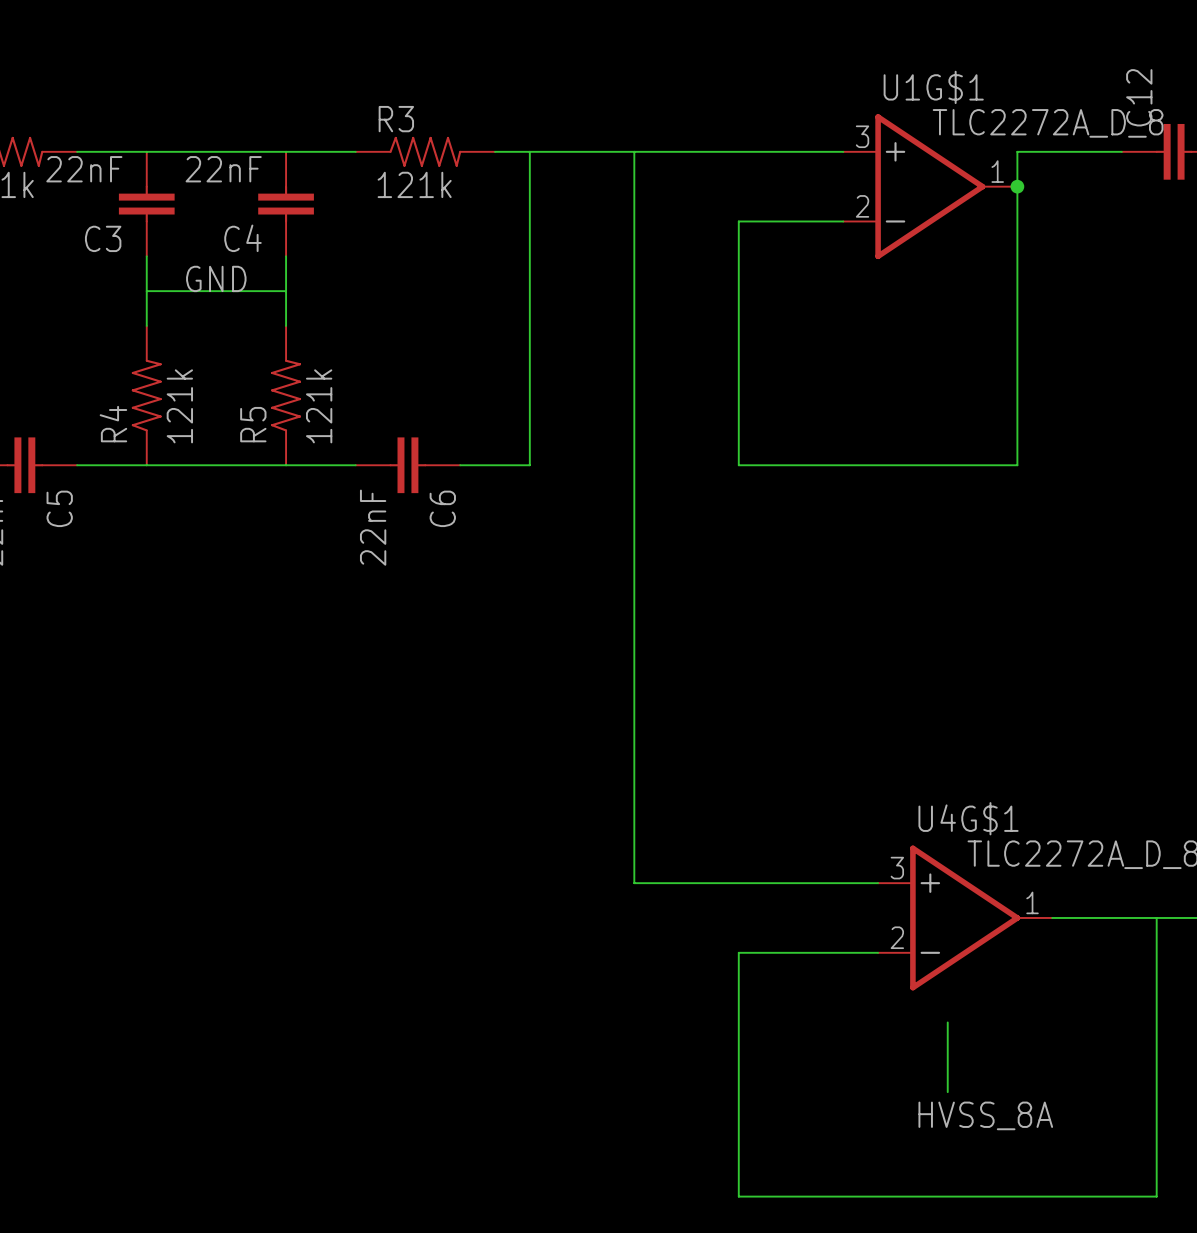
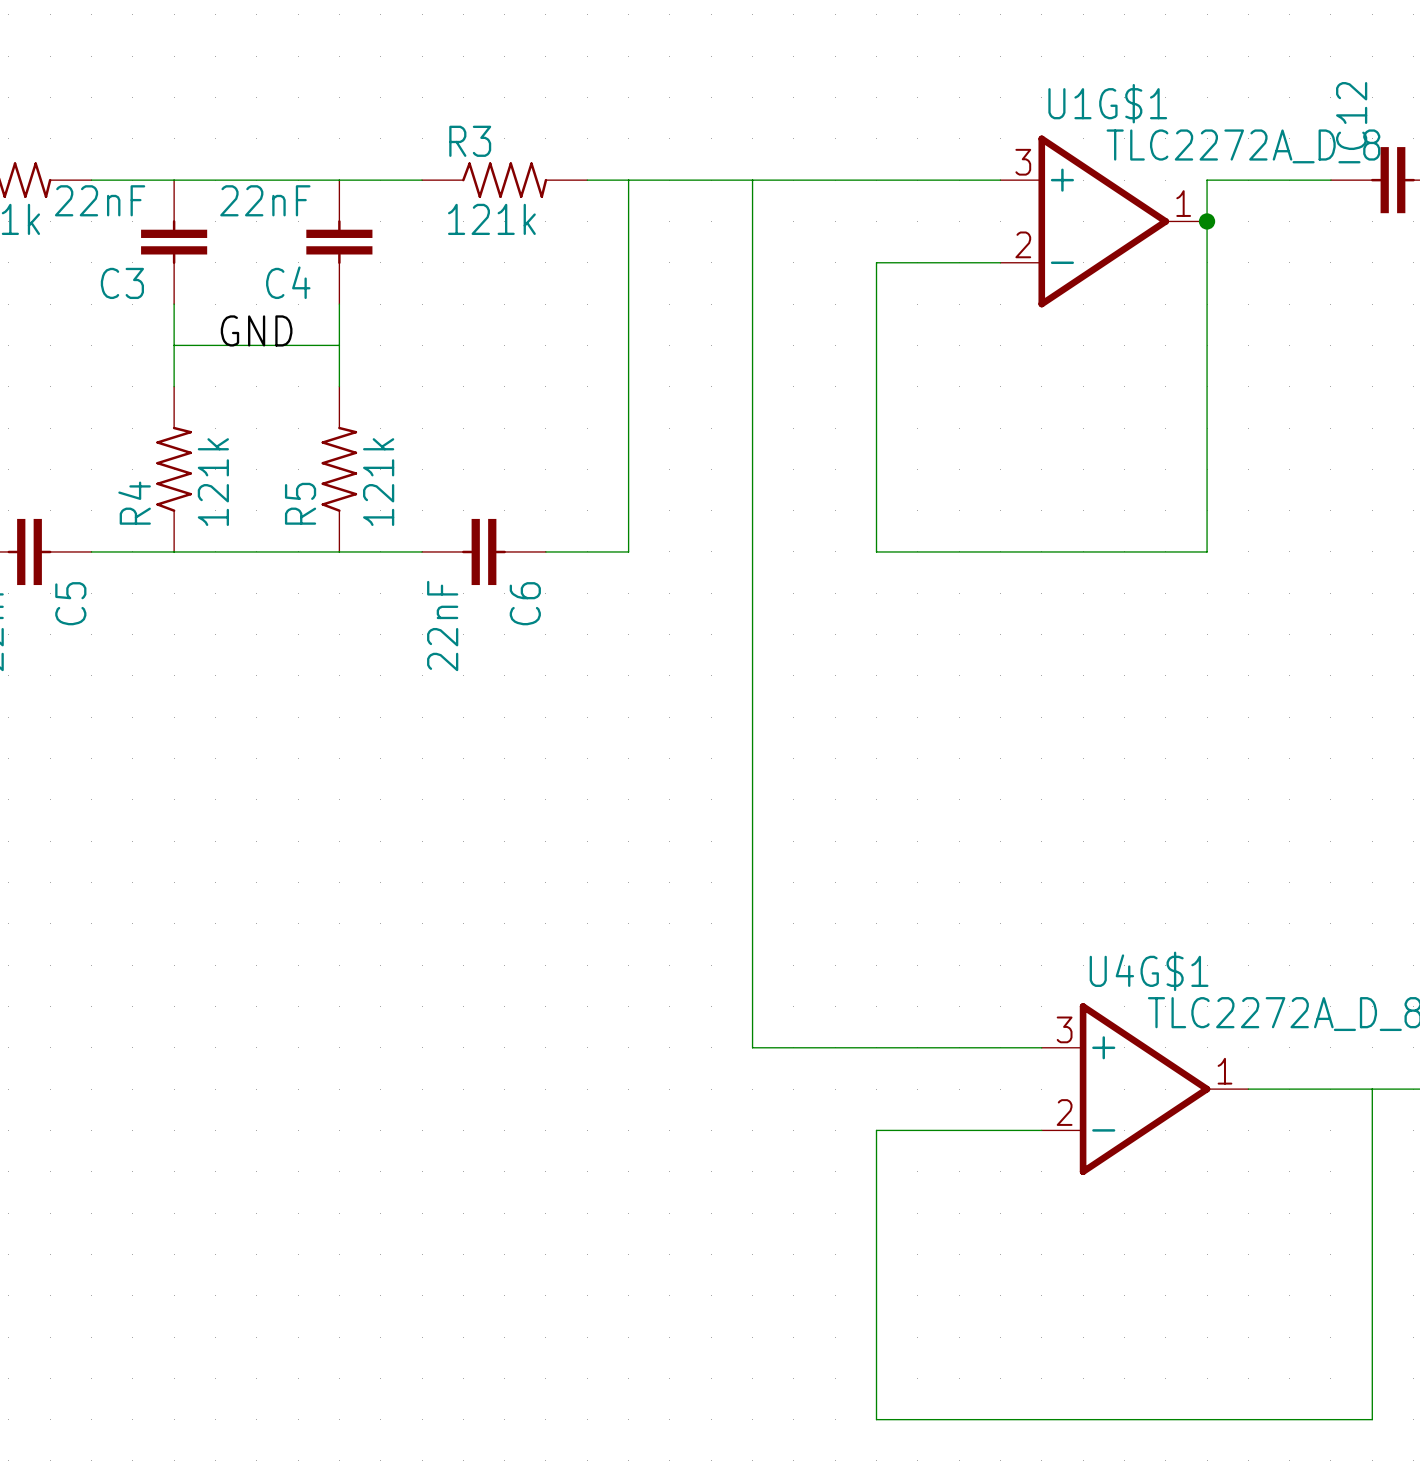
wire: (947, 1022) (947, 1092) -> none
label: HVSS_8A (985, 1115) -> none

